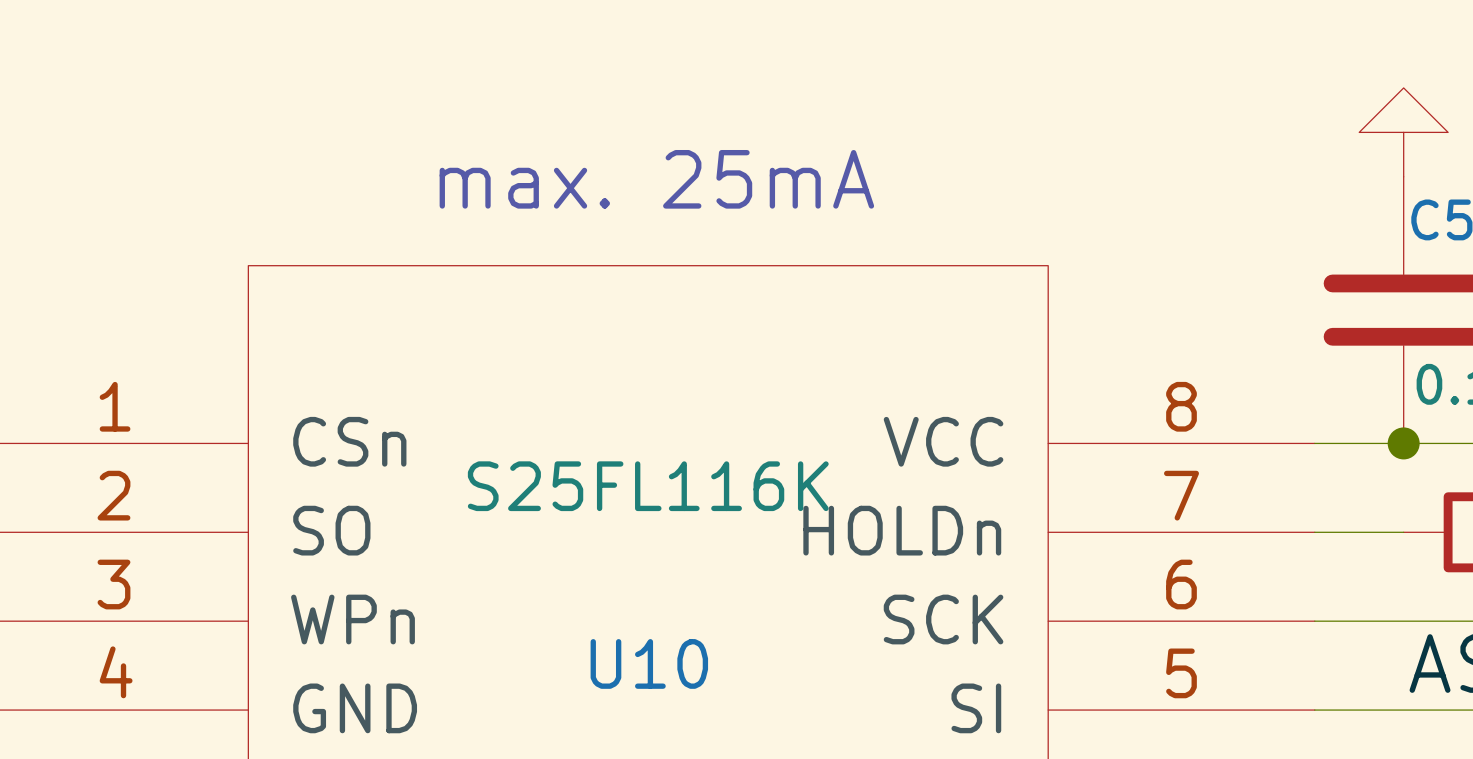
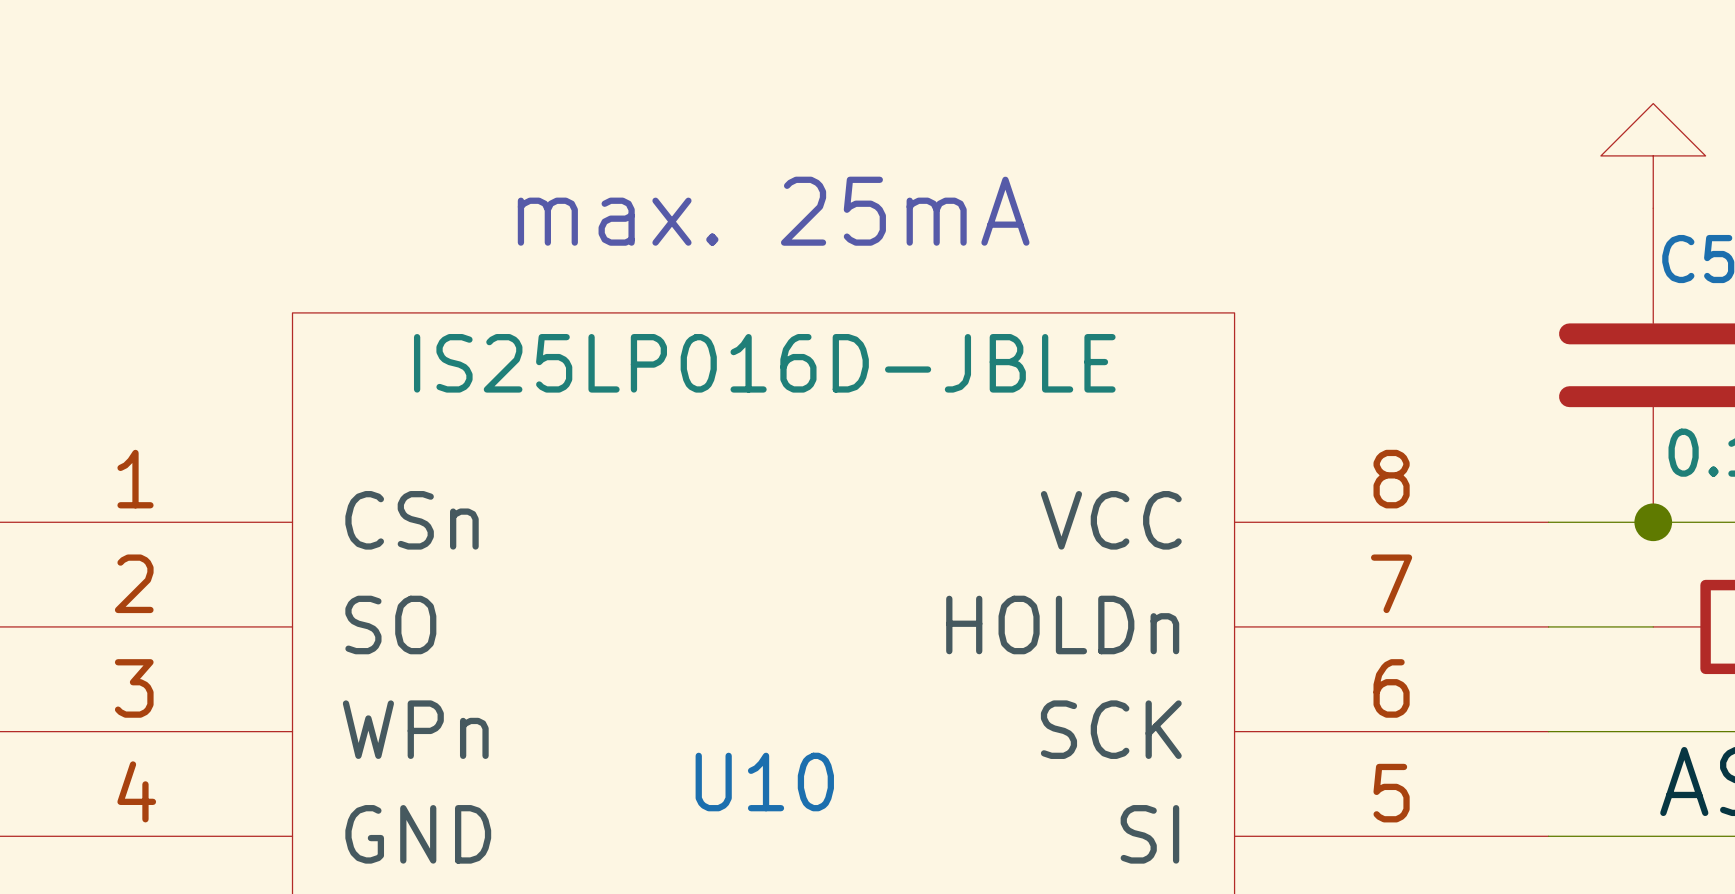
U10 value: S25FL116K (648, 486) -> IS25LP016D-JBLE (764, 363)

